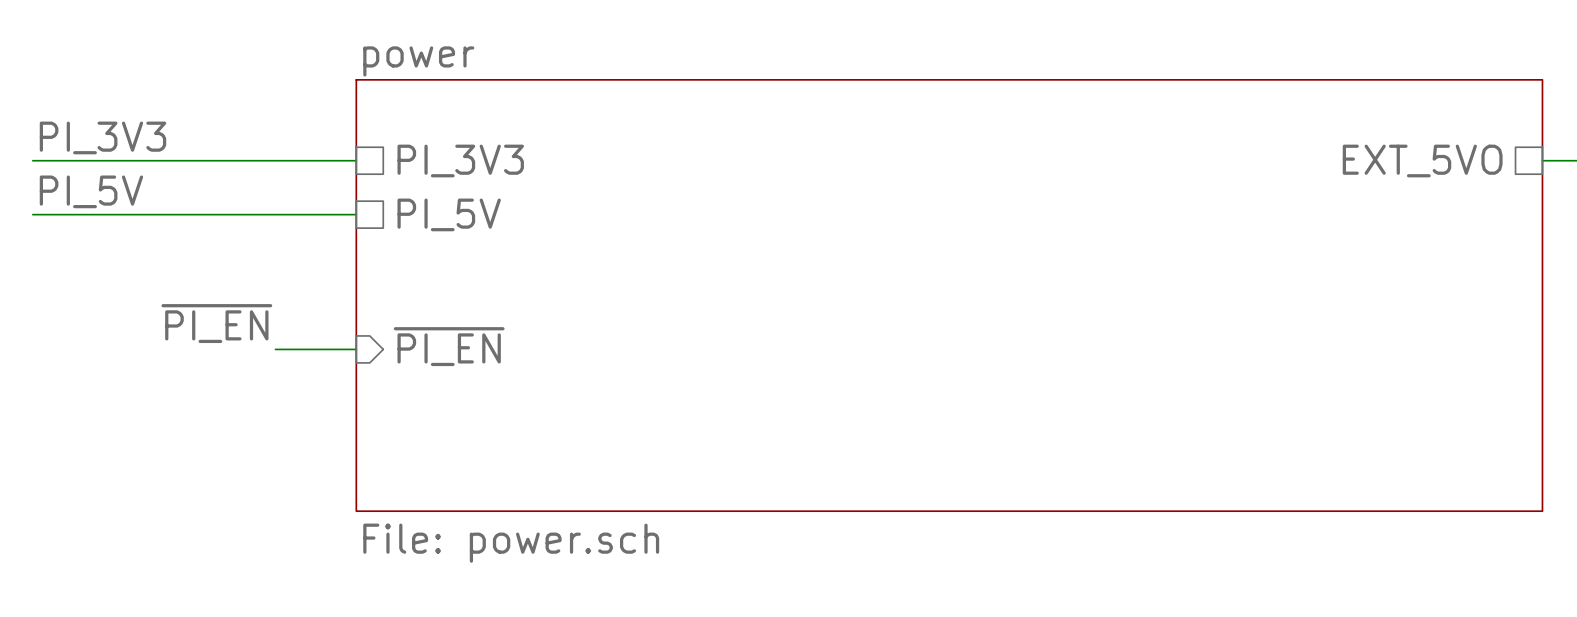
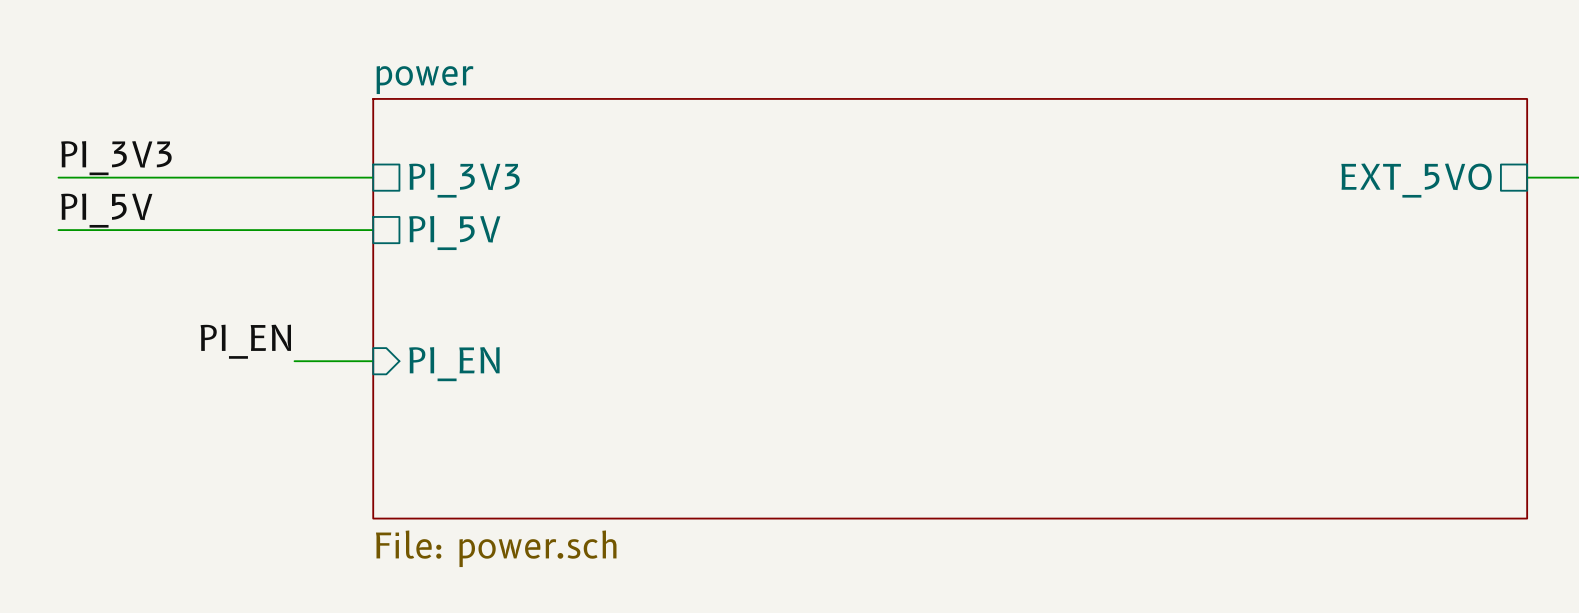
label: ~{PI_EN} (216, 323) -> PI_EN (245, 341)
sheet pin: ~{PI_EN} (449, 346) -> PI_EN (454, 364)

